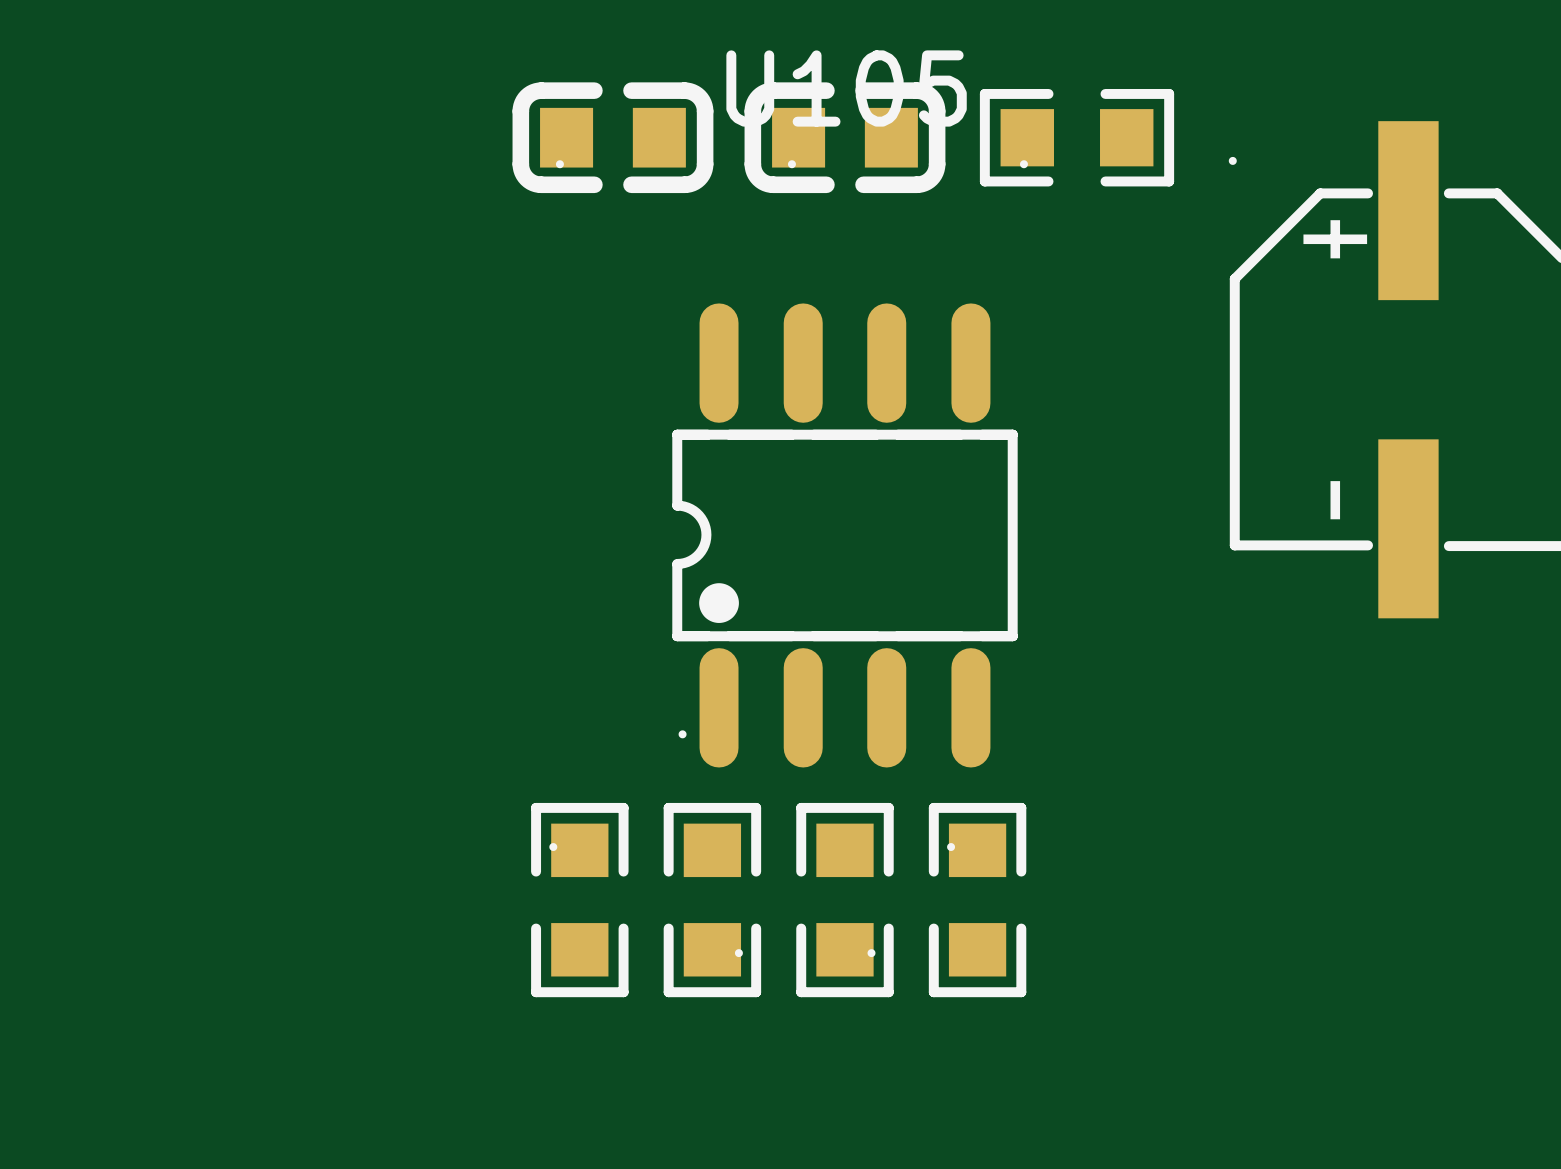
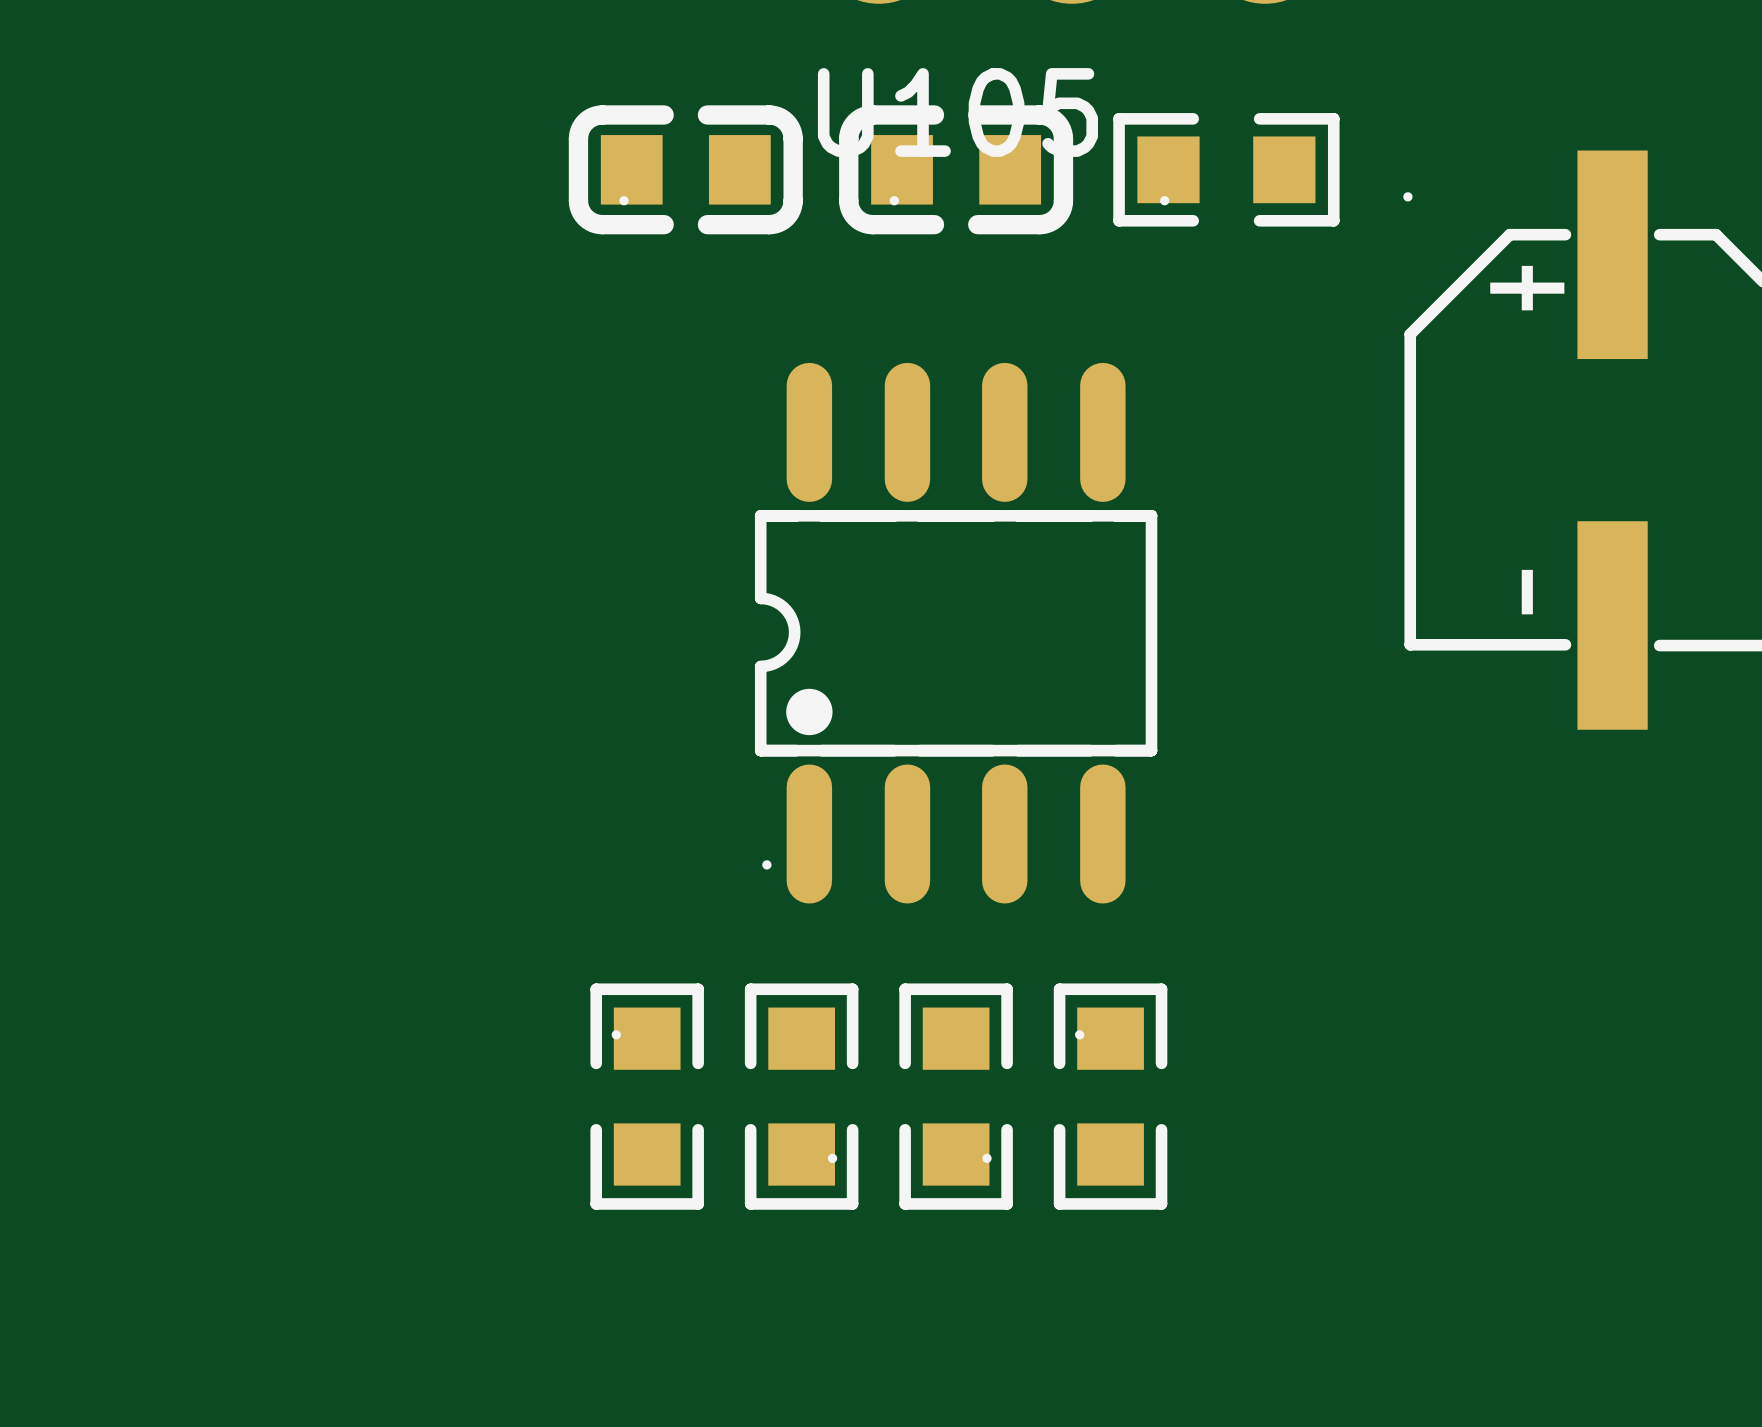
part position: (579, 900) -> (647, 1096)
part position: (712, 900) -> (801, 1096)
part position: (844, 900) -> (956, 1096)
part position: (977, 900) -> (1110, 1096)

